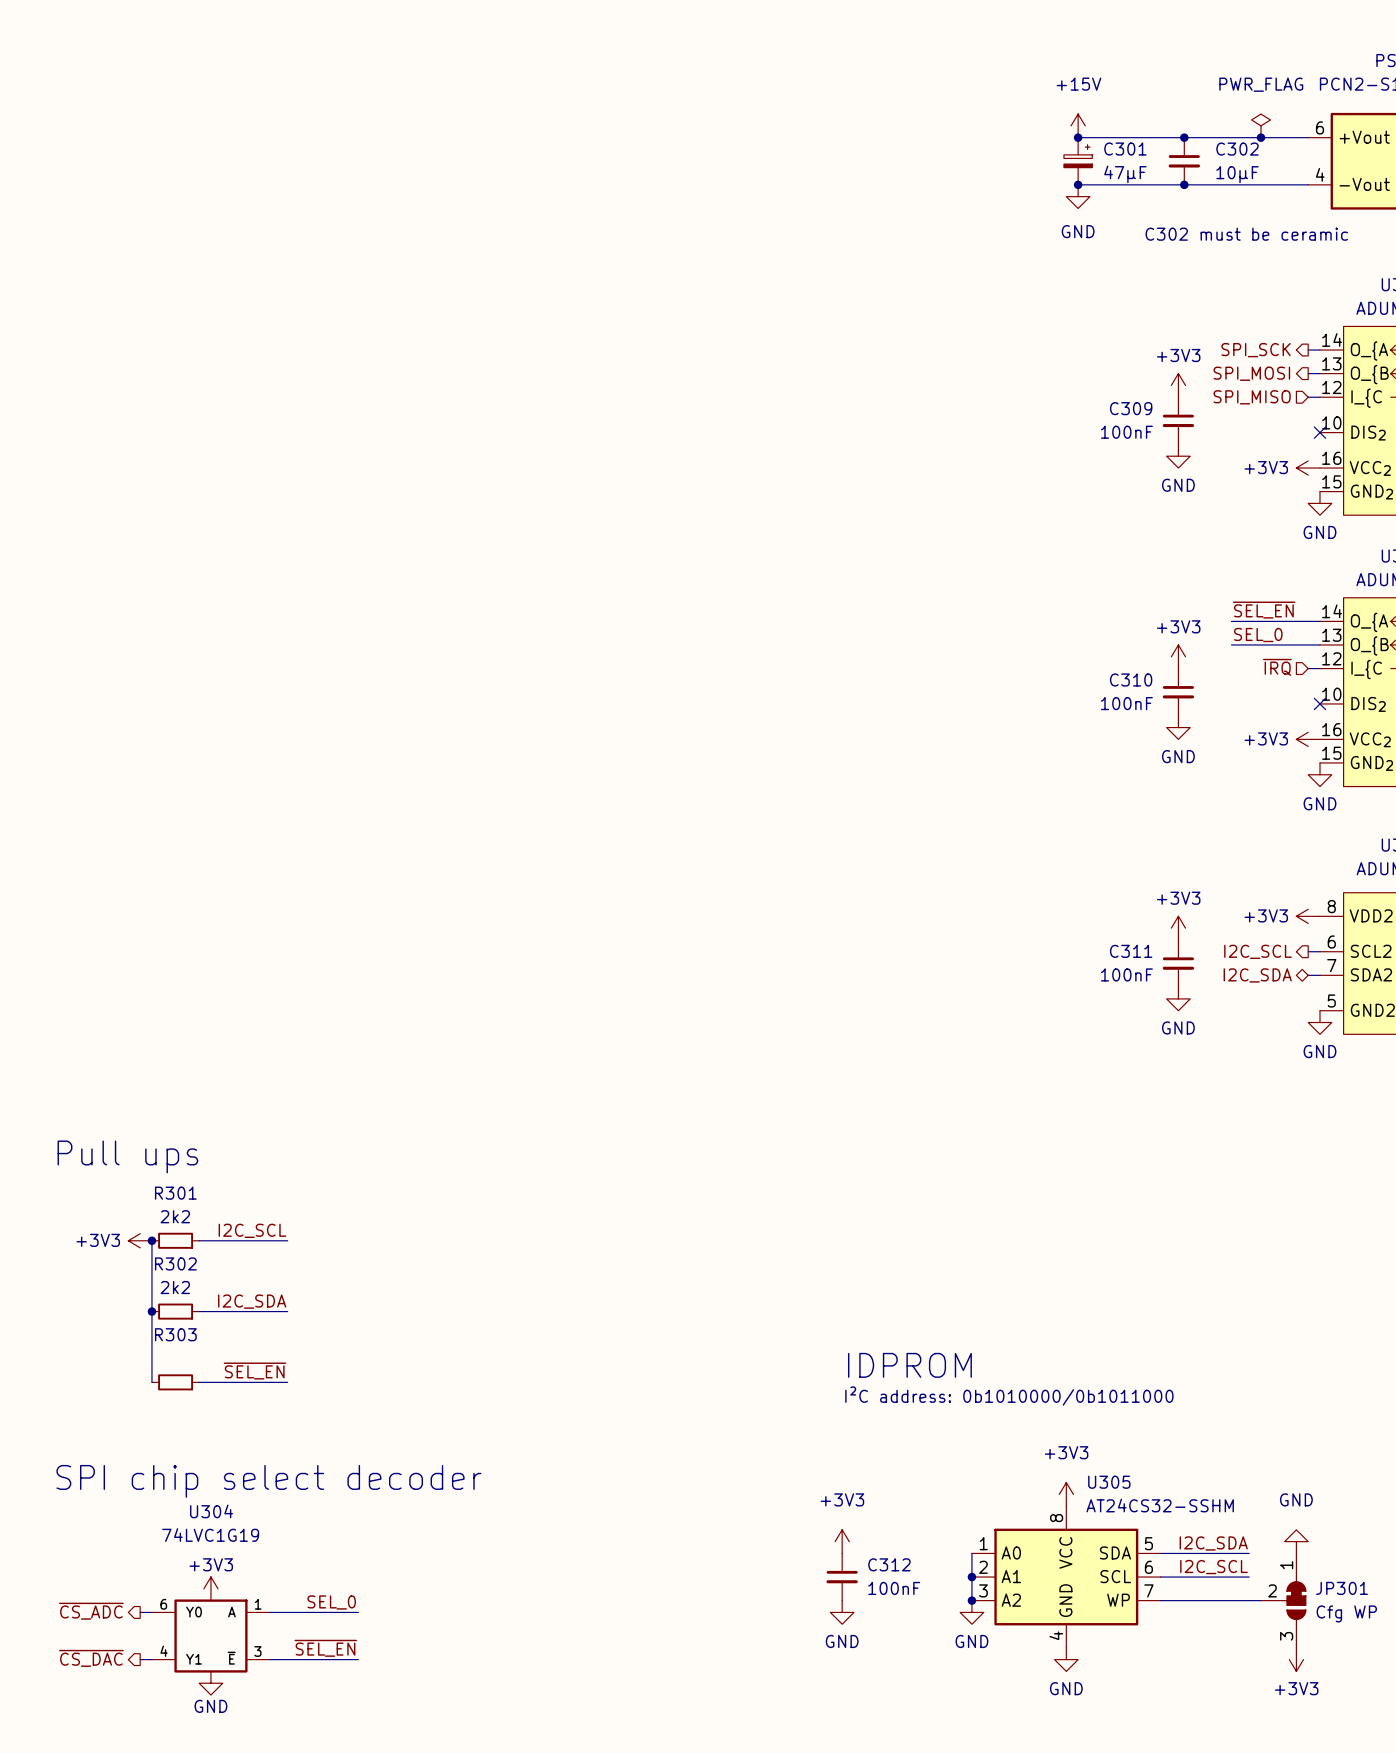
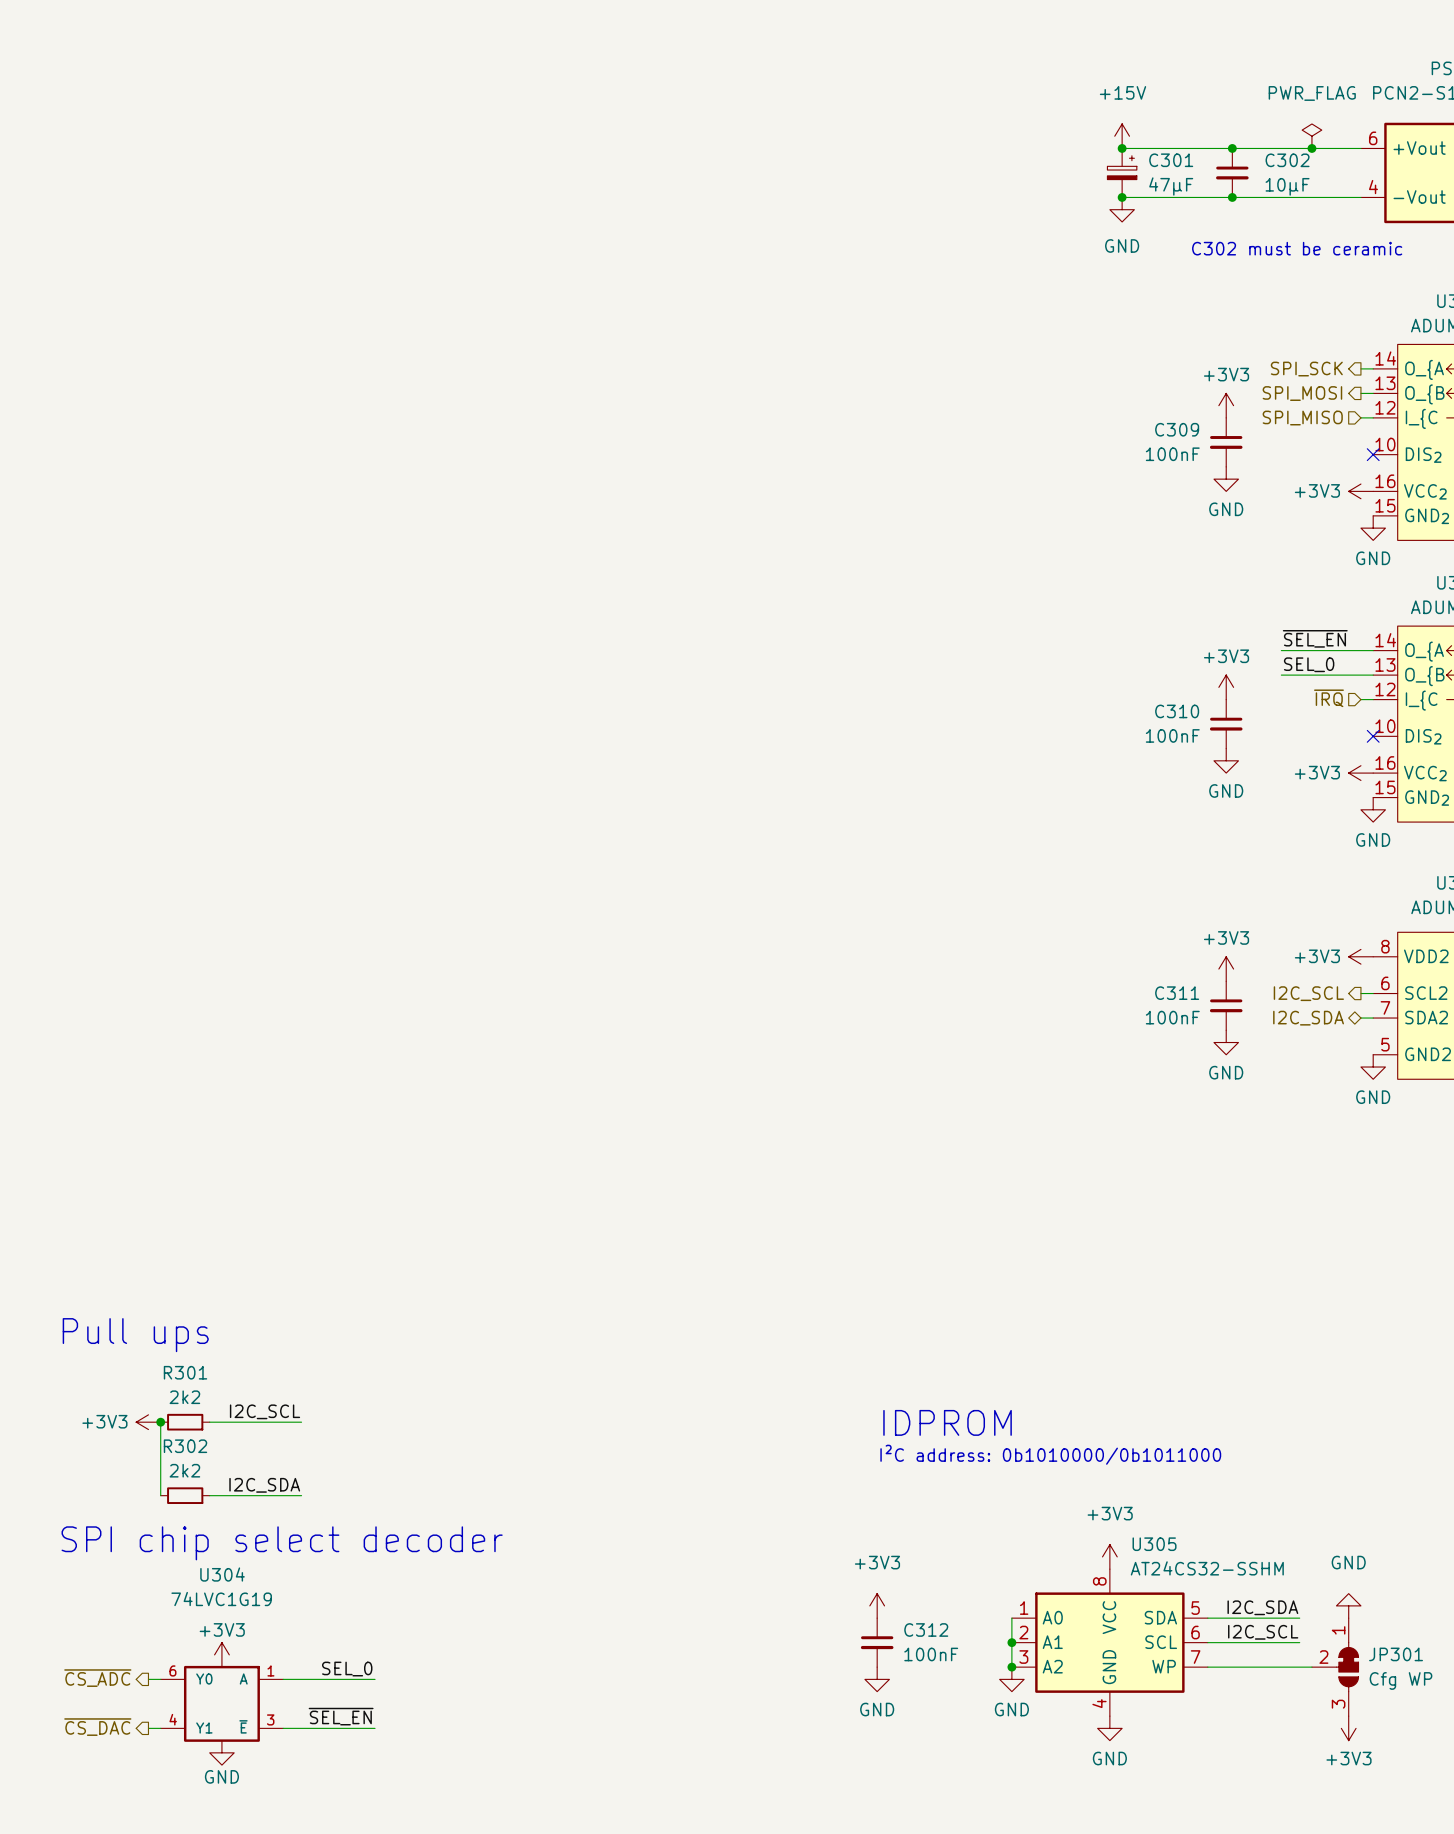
text position: Pull ups (127, 1156) -> Pull ups (135, 1335)
label position: I2C_SCL (252, 1230) -> I2C_SCL (265, 1411)
power symbol position: +3V3 (140, 1240) -> +3V3 (148, 1422)
wire: (151, 1240) (151, 1364) -> none
junction: (151, 1240) -> none
R301 position: (175, 1240) -> (185, 1422)
wire: (199, 1240) (287, 1240) -> none
label position: I2C_SDA (252, 1301) -> I2C_SDA (264, 1485)
junction position: (151, 1311) -> (160, 1422)
R302 position: (175, 1311) -> (185, 1495)
wire: (199, 1311) (287, 1311) -> (209, 1422) (301, 1422)
label: ~{SEL_EN} (254, 1371) -> none
wire: none -> (160, 1440) (160, 1495)
R303: (175, 1382) -> none
wire: (199, 1382) (287, 1382) -> (209, 1495) (301, 1495)

